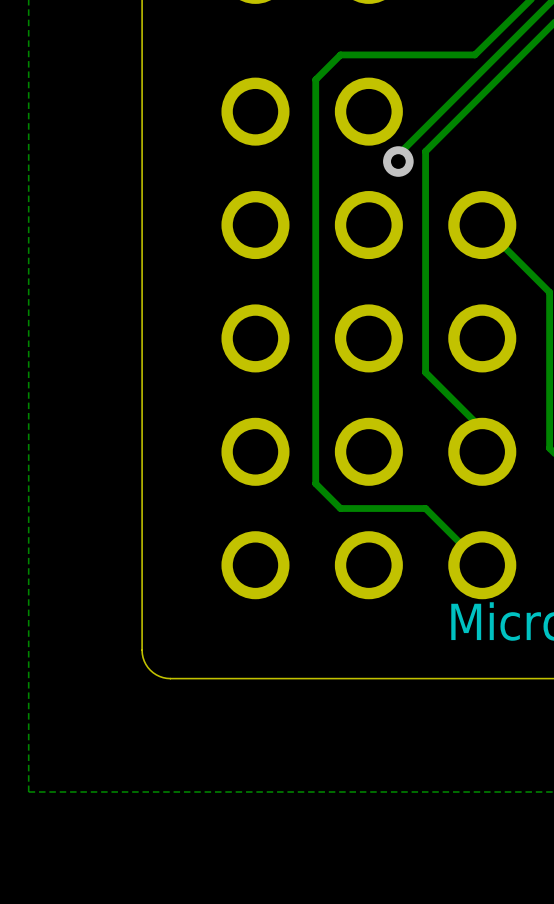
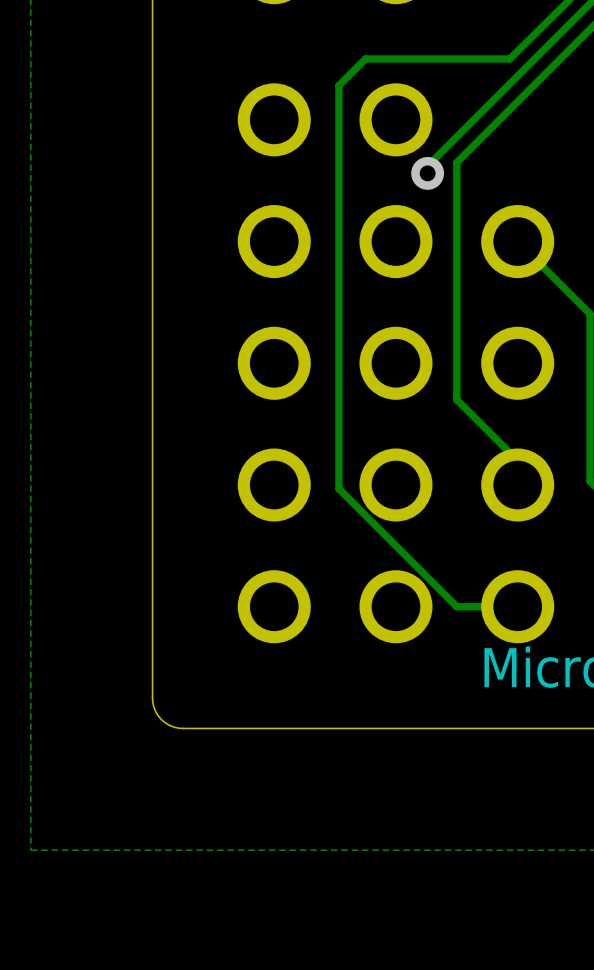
track: (315, 455) (315, 483) (340, 508) (425, 508) (482, 565) -> (338, 488) (456, 606) (517, 606)

